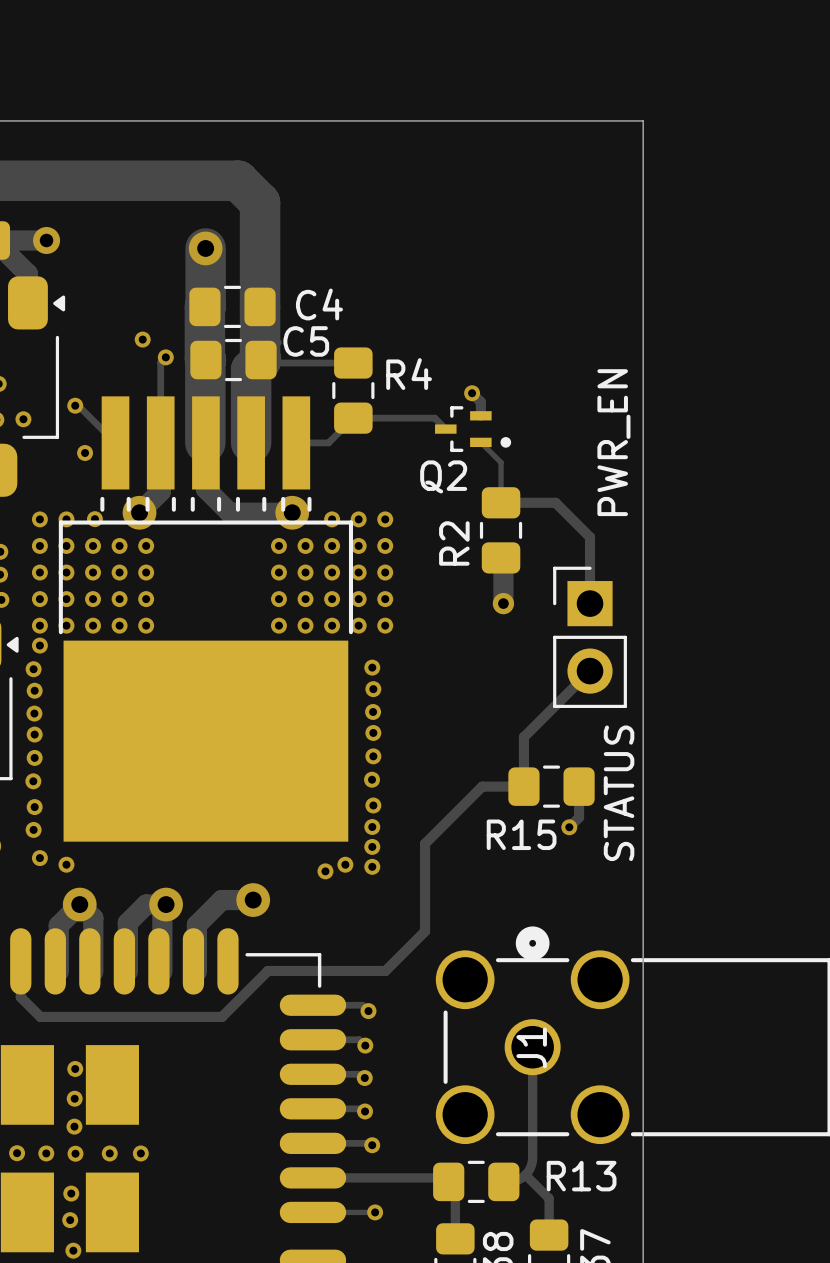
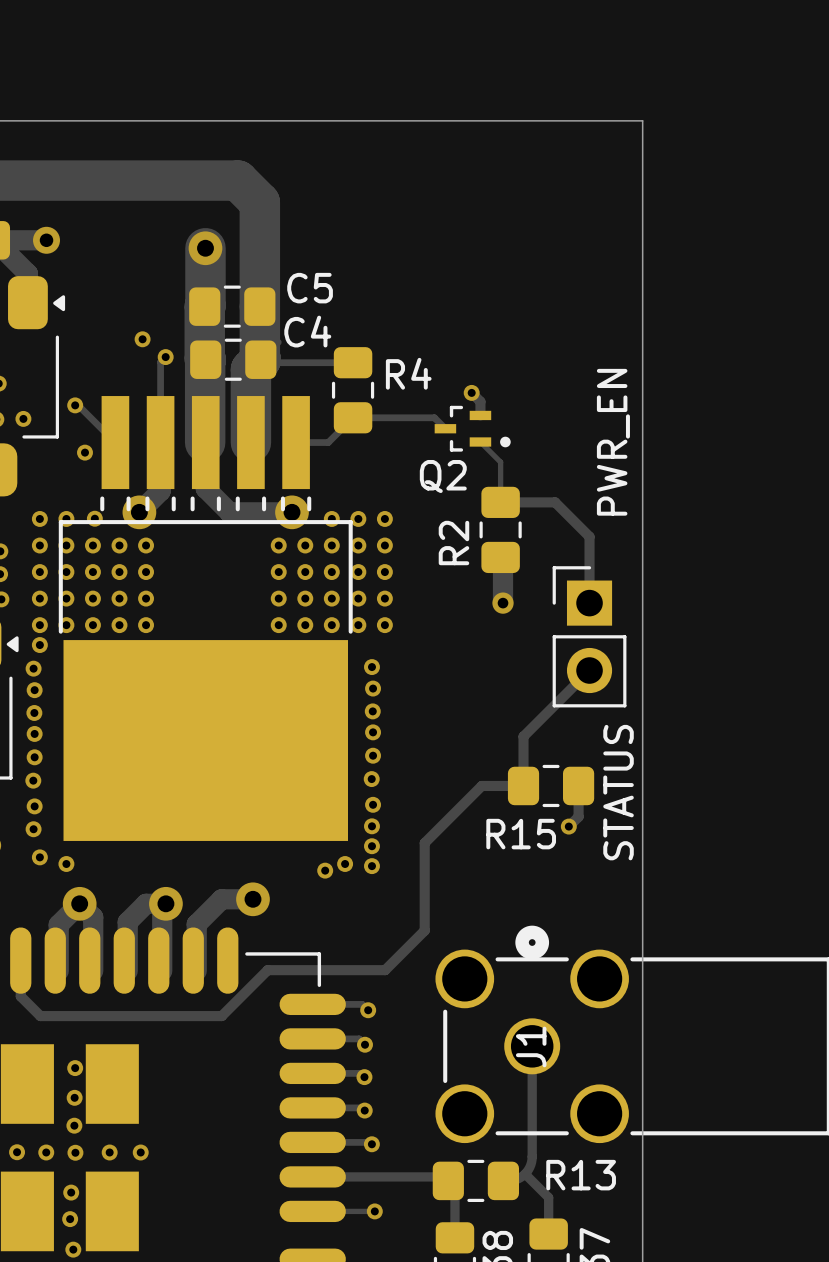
text: none -> C5 (310, 288)
text: C4 (319, 304) -> none
text: C5 (306, 341) -> C4 (307, 331)

